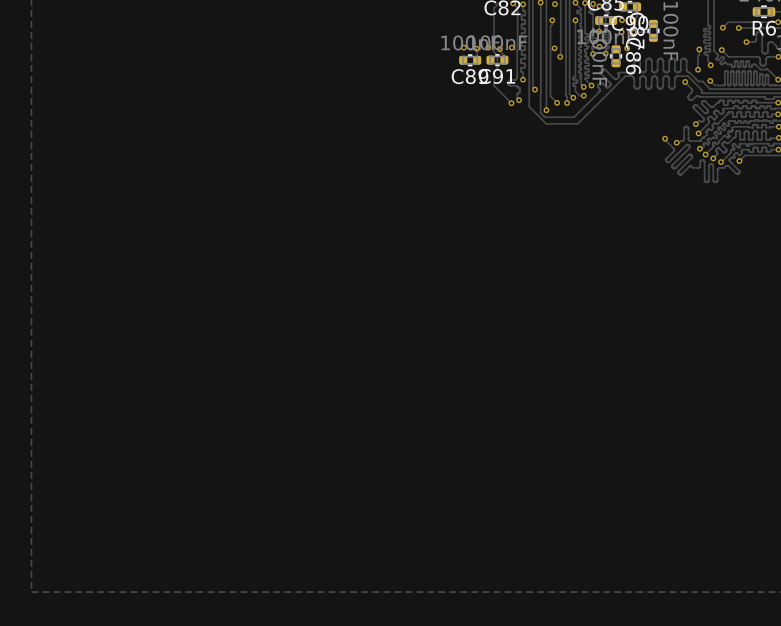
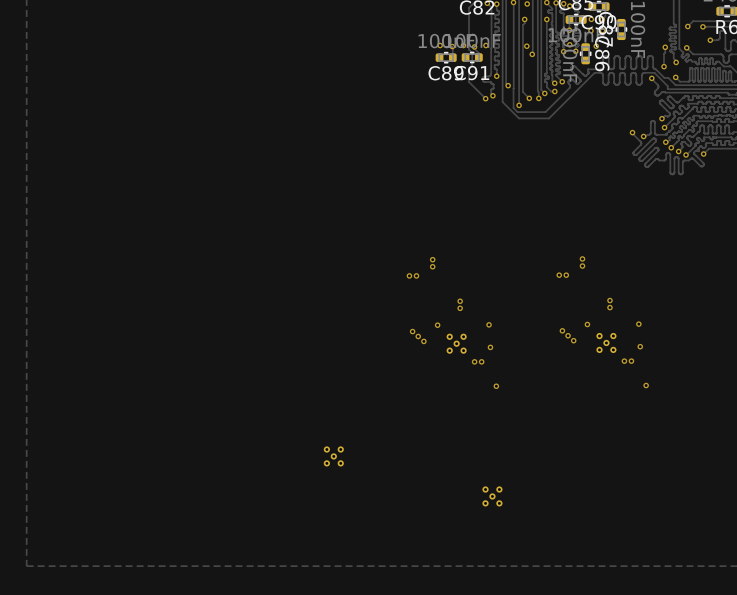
via: none -> (582, 258)
via: none -> (432, 259)
via: none -> (432, 266)
via: none -> (582, 266)
via: none -> (559, 275)
via: none -> (566, 275)
via: none -> (409, 275)
via: none -> (416, 275)
via: none -> (609, 300)
via: none -> (460, 301)
via: none -> (609, 307)
via: none -> (460, 308)
via: none -> (638, 324)
via: none -> (489, 324)
via: none -> (587, 324)
via: none -> (437, 325)
via: none -> (562, 330)
via: none -> (412, 331)
via: none -> (418, 336)
via: none -> (568, 335)
via: none -> (573, 340)
via: none -> (423, 341)
part: none -> (606, 342)
part: none -> (456, 343)
via: none -> (640, 346)
via: none -> (490, 347)
via: none -> (624, 361)
via: none -> (631, 361)
via: none -> (474, 361)
via: none -> (481, 361)
via: none -> (496, 386)
via: none -> (646, 385)
part: none -> (333, 456)
part: none -> (492, 496)

